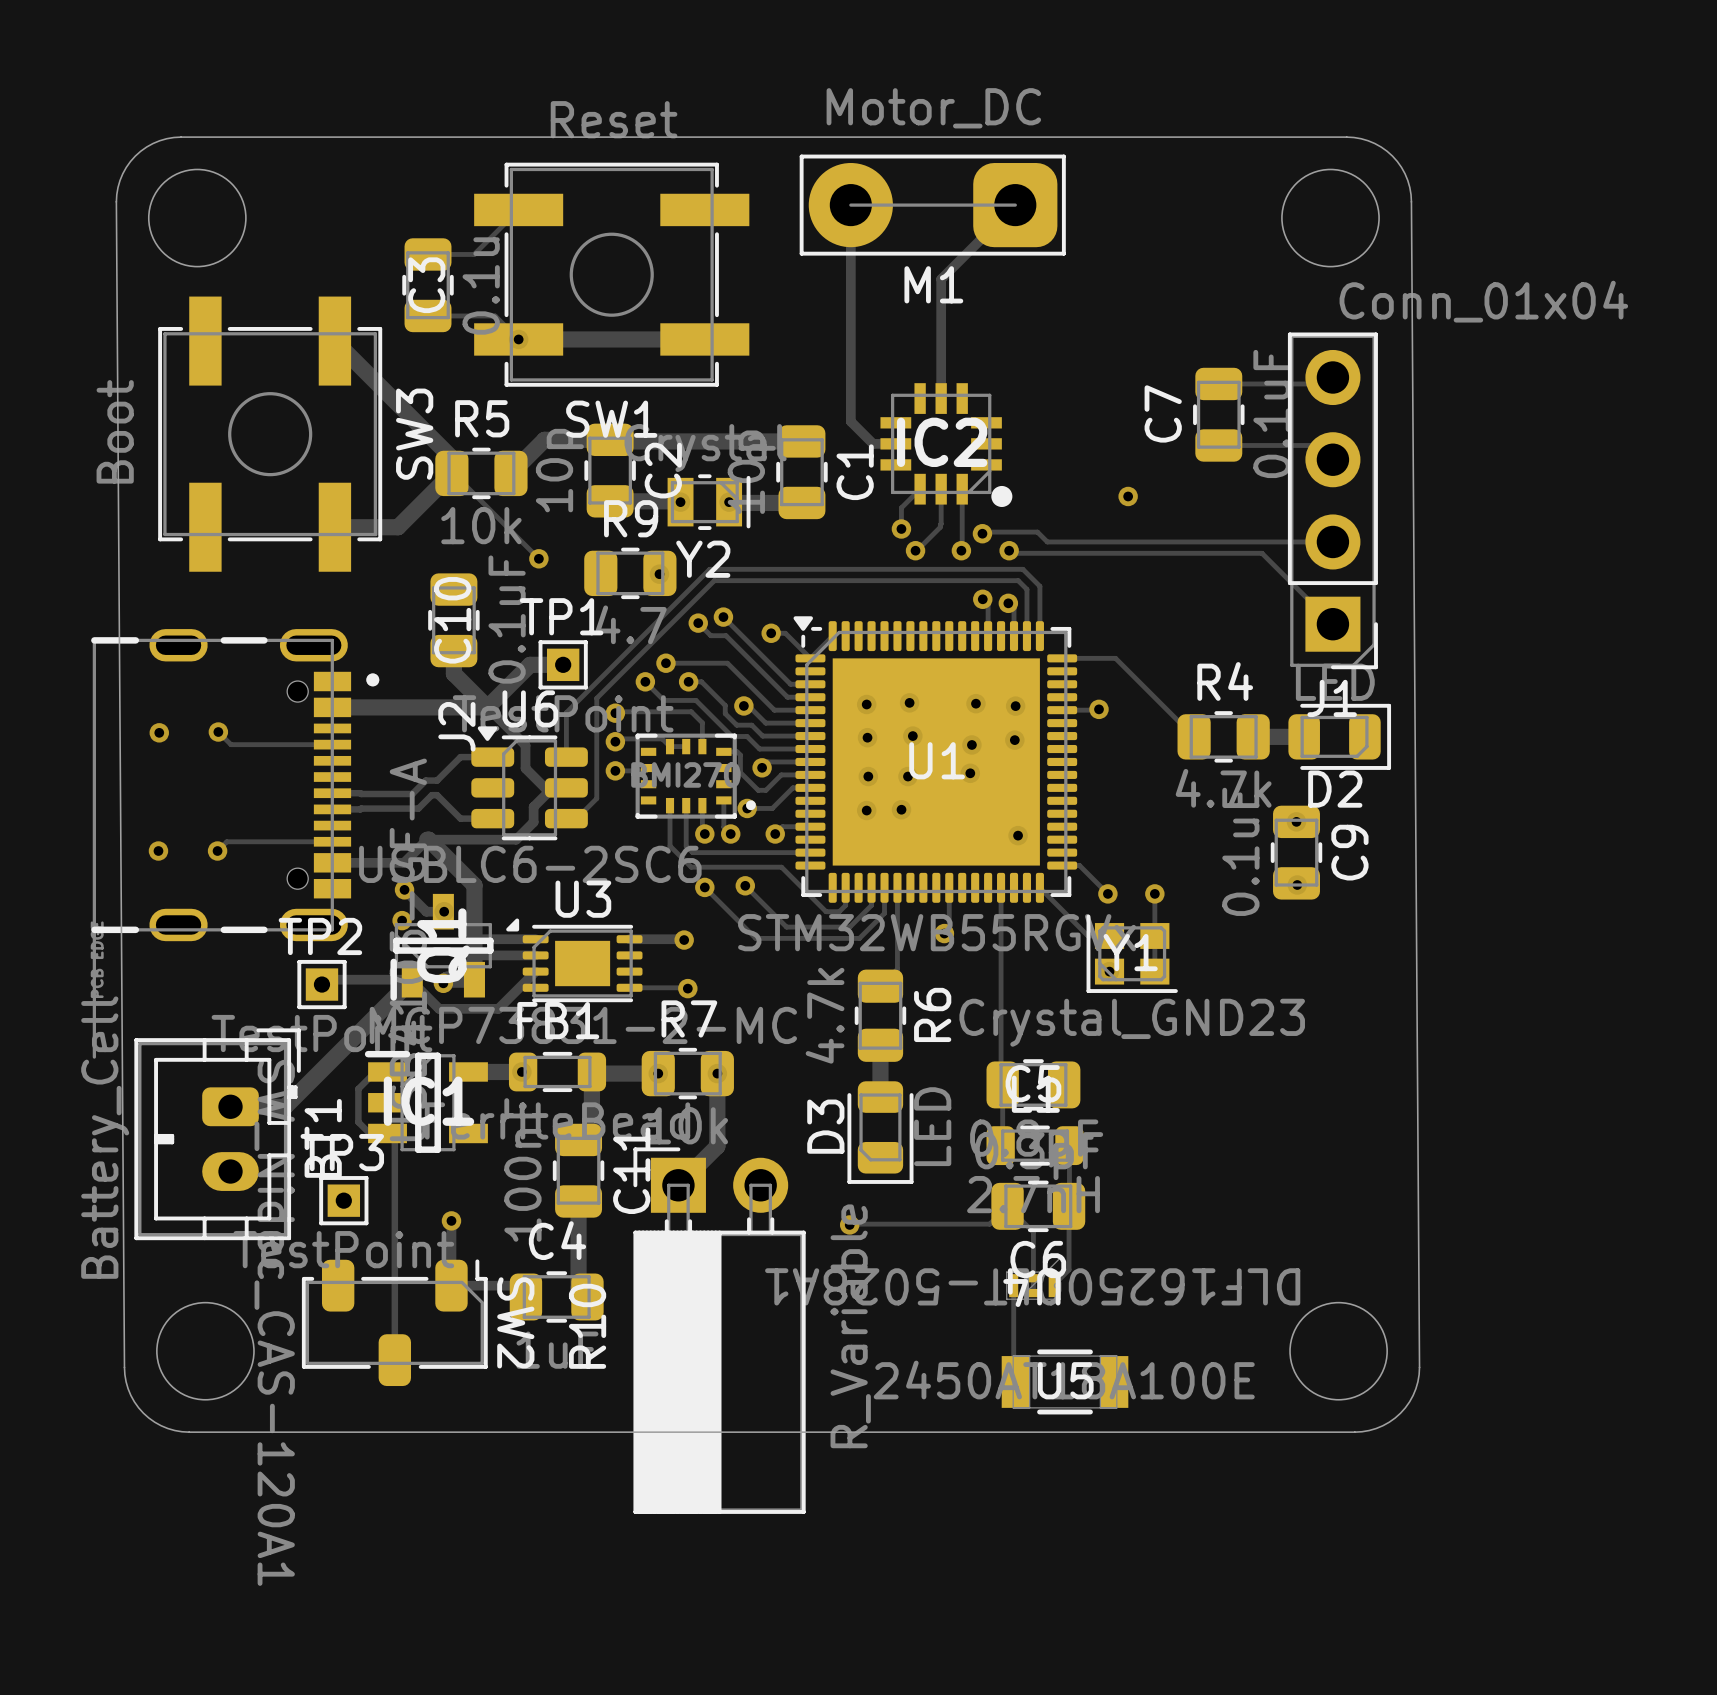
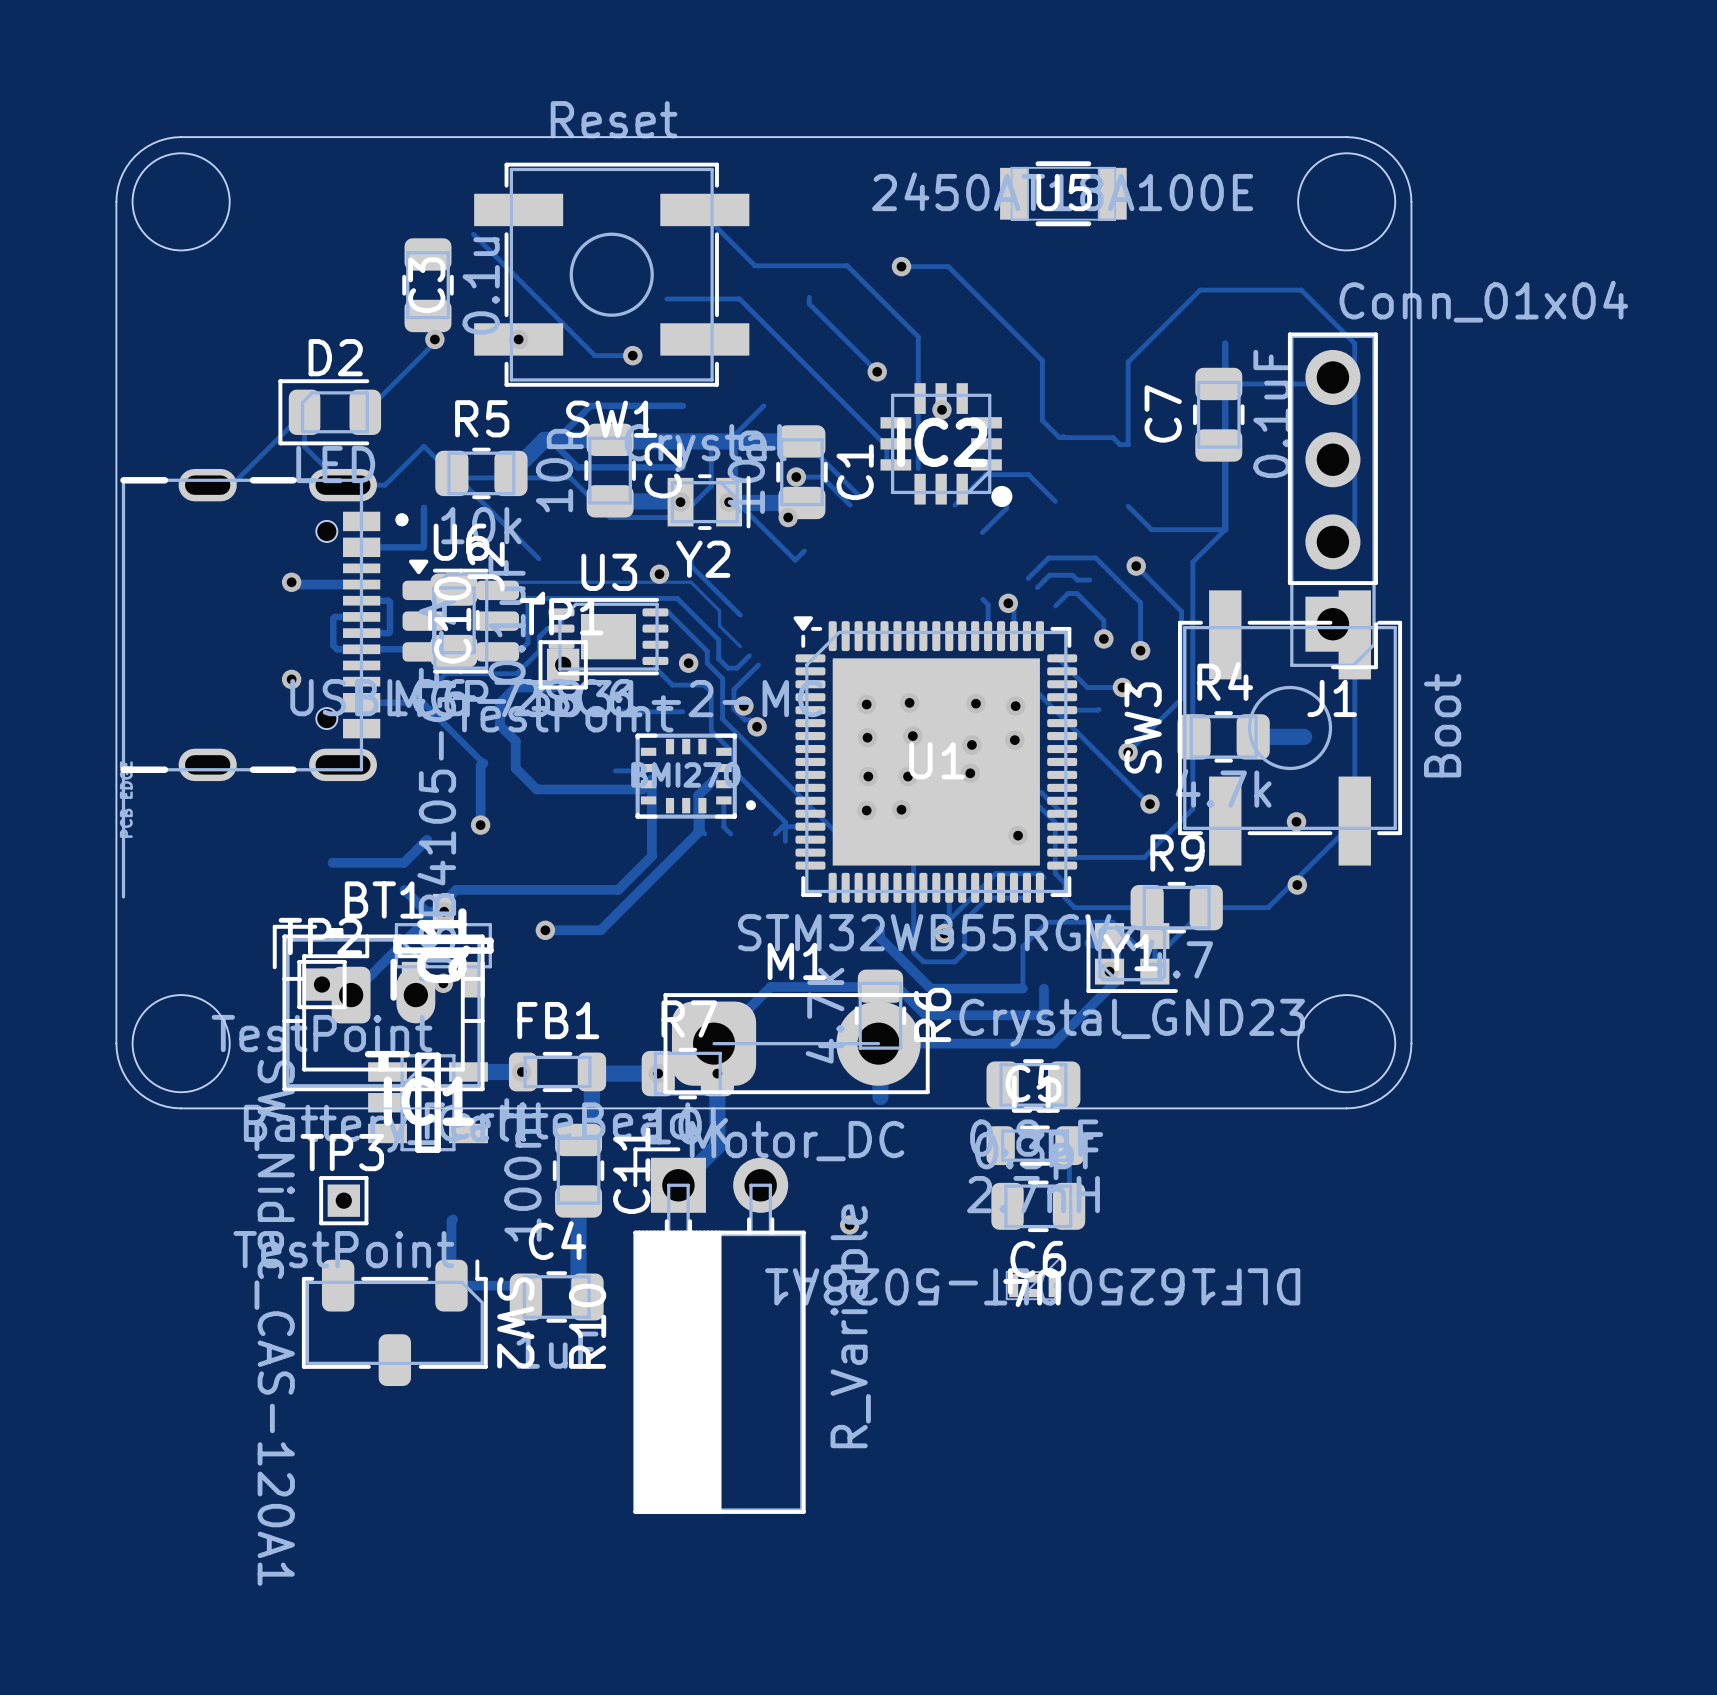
board edge: (116, 201) (124, 1374) (128, 1388) (134, 1401) (148, 1418) (167, 1428) (189, 1432) (1354, 1432) (1369, 1430) (1382, 1425) (1400, 1413) (1409, 1401) (1415, 1388) (1419, 1367) (1411, 201) -> (116, 201) (116, 1050) (122, 1071) (130, 1084) (140, 1094) (159, 1104) (181, 1108) (1346, 1108) (1368, 1104) (1387, 1094) (1397, 1084) (1405, 1071) (1409, 1058) (1411, 1043) (1411, 201)
track: (850, 205) (850, 421) (873, 443) (895, 443) -> none
M1 rotation: 0° (932, 205) -> 180° (796, 1043)
M1 position: (932, 205) -> (796, 1043)
track: (1015, 205) (941, 279) (941, 398) -> none
track: (518, 209) (474, 254) (428, 254) -> none
round board edge position: (197, 218) -> (181, 201)
round board edge position: (1330, 218) -> (1346, 201)
track: none -> (666, 219) (708, 219) (755, 265) (847, 265) (918, 336) (918, 468)
track: none -> (473, 234) (594, 355) (632, 355)
track: none -> (901, 266) (948, 266) (1042, 360) (1042, 420) (1059, 437) (1113, 437) (1120, 444) (1128, 444) (1128, 362) (1200, 290) (1301, 290) (1354, 343) (1354, 529)
via: none -> (901, 266)
track: none -> (809, 297) (809, 303) (877, 371)
track: none -> (666, 298) (739, 298) (886, 446) (886, 468)
track: (428, 315) (495, 315) (518, 339) (704, 339) -> none
track: none -> (434, 339) (434, 342) (365, 412)
via: none -> (434, 339)
track: (334, 341) (451, 458) (451, 473) (398, 527) (334, 527) -> none
track: none -> (1225, 343) (1225, 529)
via: none -> (632, 355)
via: none -> (877, 371)
track: none -> (682, 405) (590, 405) (553, 443) (577, 467) (682, 467)
track: none -> (763, 405) (735, 434) (735, 500) (795, 560) (804, 551)
via: none -> (941, 409)
SW3 value position: Boot (115, 431) -> Boot (1442, 725)
SW3 position: (270, 434) -> (1290, 727)
SW3 name position: SW3 (414, 434) -> SW3 (1143, 727)
track: none -> (682, 436) (707, 436) (711, 440) (711, 485) (679, 517) (610, 517) (570, 477) (455, 477) (423, 446) (385, 485) (343, 485) (304, 446) (304, 412) (231, 485) (207, 485)
track: (1218, 445) (1318, 445) (1332, 459) -> none
track: none -> (796, 451) (814, 451) (859, 496)
track: none -> (796, 477) (822, 477) (850, 505)
via: none -> (796, 477)
track: (920, 489) (901, 507) (901, 528) -> none
track: (941, 489) (940, 527) (915, 550) -> none
track: (962, 489) (961, 550) -> none
via: (1128, 496) -> none
track: none -> (1055, 501) (1028, 474) (985, 474) (954, 505)
track: none -> (1128, 506) (1151, 529) (1225, 529)
track: none -> (423, 507) (423, 547) (361, 547)
via: none -> (788, 517)
via: (901, 528) -> none
track: none -> (1225, 529) (1192, 562) (1192, 808) (1144, 857) (1066, 857) (1066, 817) (1041, 792) (1029, 792) (999, 763) (999, 746) (982, 729)
track: (982, 533) (984, 532) (1037, 532) (1047, 541) (1332, 541) -> (982, 532) (1006, 508) (1006, 493)
via: (982, 533) -> none
via: (915, 550) -> none
via: (961, 550) -> none
track: (1009, 550) (1011, 553) (1262, 553) (1332, 624) -> none
via: (1009, 550) -> none
track: none -> (691, 557) (691, 565) (740, 615)
via: (538, 558) -> none
track: none -> (1136, 566) (1181, 611) (1181, 698) (1128, 752)
via: none -> (1136, 566)
R9 position: (630, 573) -> (1176, 907)
track: none -> (1028, 578) (1048, 557) (1095, 557) (1140, 602) (1140, 650)
track: none -> (1089, 580) (1077, 580) (1072, 575) (1049, 575) (1037, 587)
track: none -> (291, 582) (293, 584) (361, 584)
via: none -> (291, 582)
track: none -> (497, 590) (505, 582) (691, 582) (719, 610) (719, 625) (740, 646)
via: (982, 599) -> none
track: none -> (361, 600) (388, 600) (389, 602) (389, 631) (388, 633) (361, 633)
track: none -> (1055, 605) (1068, 593) (1077, 593) (1103, 620) (1103, 638)
track: none -> (561, 612) (561, 628) (547, 628) (539, 636) (539, 651) (516, 673) (445, 673) (440, 679)
track: none -> (655, 612) (668, 612) (707, 651) (707, 663) (722, 678) (722, 719) (836, 833) (844, 833)
track: none -> (361, 616) (334, 616) (333, 618) (333, 645) (337, 649) (421, 649) (423, 651)
track: (723, 617) (790, 684) (810, 684) -> none
via: (723, 617) -> none
track: (698, 623) (710, 635) (726, 635) (787, 697) (810, 697) -> none
via: (698, 623) -> none
track: (771, 633) (785, 633) (810, 658) (832, 636) -> none
via: (771, 633) -> none
track: none -> (1354, 634) (1354, 821) (1268, 907) (1206, 907) (1167, 946) (1137, 946) (1112, 922) (1047, 922) (1022, 946) (1022, 988) (930, 988) (880, 938) (880, 930)
track: (1026, 636) (1026, 589) (1018, 580) (714, 580) (596, 698) (596, 798) (576, 818) (566, 818) -> none
track: (1039, 636) (1039, 586) (1022, 569) (709, 569) (566, 712) (566, 757) -> none
via: none -> (1103, 638)
track: none -> (561, 644) (561, 679) (553, 687) (515, 687) (500, 703) (500, 725) (515, 741) (515, 768) (536, 789) (642, 789) (651, 779) (651, 856) (618, 889) (456, 889) (351, 995)
via: none -> (1140, 650)
track: (453, 651) (453, 673) (487, 707) -> none
track: none -> (497, 651) (519, 651) (527, 642) (527, 598) (677, 598) (718, 639) (718, 658) (728, 668) (737, 668) (749, 655)
track: none -> (1055, 655) (1087, 687) (1122, 687)
track: (1062, 658) (1115, 658) (1194, 736) -> none
track: none -> (655, 660) (655, 668) (672, 685) (704, 685) (711, 692) (711, 730) (733, 753) (733, 770) (785, 822) (785, 841)
track: (665, 663) (727, 663) (774, 710) (810, 710) -> none
via: (665, 663) -> none
track: (563, 664) (530, 664) (487, 707) -> none
track: none -> (758, 664) (733, 689) (733, 709) (744, 719) (750, 719) (757, 726)
track: none -> (1037, 674) (1028, 683) (1150, 804)
via: none -> (291, 679)
track: (645, 681) (663, 700) (696, 700) (732, 736) (747, 736) (759, 749) (810, 749) -> none
via: (645, 681) -> none
track: (688, 681) (701, 681) (725, 705) (725, 713) (736, 725) (751, 725) (762, 736) (810, 736) -> none
via position: (688, 681) -> (688, 663)
via: none -> (1122, 687)
track: none -> (361, 702) (422, 702) (483, 763) (480, 766) (480, 825)
track: (743, 705) (748, 705) (765, 723) (810, 723) -> none
track: (332, 707) (487, 707) -> none
track: (487, 707) (525, 745) (525, 768) (544, 787) (566, 787) -> none
via: (1099, 709) -> none
track: (682, 711) (691, 711) (702, 722) (702, 746) -> none
via: (615, 713) -> none
via: none -> (757, 726)
via: (159, 732) -> none
track: (218, 732) (230, 744) (332, 744) -> none
via: (218, 732) -> none
D2 rotation: 0° (1339, 736) -> 180° (329, 412)
D2 position: (1339, 736) -> (329, 412)
track: none -> (973, 738) (988, 753) (988, 767) (1024, 804) (1036, 804) (1055, 822) (1055, 873) (1065, 883) (1065, 897) (1074, 907) (1147, 907)
track: (615, 741) (618, 738) (662, 738) (670, 746) (686, 746) -> none
via: (615, 741) -> none
track: (723, 751) (737, 751) (740, 755) (740, 772) (758, 790) (765, 790) (781, 774) (810, 774) -> none
via: none -> (1128, 752)
track: (492, 757) (460, 757) (437, 780) (425, 780) (412, 794) (332, 793) -> none
track: (810, 761) (767, 761) (762, 767) -> none
via: (762, 767) -> none
via: (615, 770) -> none
track: none -> (714, 779) (698, 795) (698, 832) (600, 930) (545, 930)
U6 position: (529, 783) -> (460, 616)
track: (552, 787) (533, 806) (533, 822) (516, 839) (427, 839) (474, 885) (474, 979) (447, 979) (443, 983) -> none
track: (810, 787) (792, 787) (772, 808) (747, 808) -> none
via: none -> (1150, 804)
track: (670, 805) (670, 845) (691, 867) (781, 867) (826, 911) (839, 911) (845, 905) (845, 887) -> none
track: (686, 805) (686, 846) (692, 852) (810, 852) -> none
via: (747, 808) -> none
track: (332, 809) (418, 808) (431, 795) (437, 795) (460, 818) (492, 818) -> none
via: none -> (480, 825)
track: none -> (933, 825) (913, 845) (913, 952) (923, 961) (954, 961) (964, 952) (964, 920) (987, 897) (1022, 897)
via: (704, 834) -> none
via: (730, 834) -> none
via: (775, 834) -> none
track: (332, 841) (226, 841) (217, 851) -> none
J2 position: (235, 843) -> (264, 683)
via: (158, 851) -> none
via: (217, 851) -> none
C9: 0.1uF (1296, 852) -> none
track: (1062, 865) (1079, 865) (1107, 893) -> none
track: none -> (1043, 877) (1039, 873) (995, 873) (939, 930)
track: (745, 885) (786, 927) (849, 927) (871, 905) (871, 887) -> none
via: (745, 885) -> none
track: (704, 887) (755, 938) (859, 938) (884, 913) (884, 887) -> none
via: (704, 887) -> none
track: (897, 887) (897, 969) (880, 986) -> none
track: (1001, 887) (1002, 1143) (1000, 1145) -> none
track: (1039, 887) (1088, 935) (1109, 935) -> none
via: (404, 889) -> none
via: (1107, 893) -> none
via: (1154, 893) -> none
via: (402, 920) -> none
via: none -> (545, 930)
track: (535, 939) (474, 940) -> none
track: (629, 939) (684, 940) -> none
via: (684, 940) -> none
track: none -> (1089, 943) (1114, 943) (1116, 944) (1116, 981) (1053, 1043) (878, 1043)
track: (474, 954) (535, 955) -> none
U3 position: (574, 960) -> (600, 633)
track: (535, 971) (498, 1008) (439, 1008) (412, 982) (412, 979) -> none
track: (412, 979) (285, 1106) (230, 1106) -> none
track: (412, 979) (326, 979) (321, 984) -> none
track: (629, 987) (687, 988) -> none
via: (687, 988) -> none
track: none -> (1043, 988) (1043, 1013) (1042, 1015) (925, 1015) (897, 986) (770, 986) (714, 1043)
track: (387, 1071) (375, 1071) (358, 1088) (358, 1122) (369, 1133) (387, 1133) (394, 1140) (394, 1360) -> none
D3: LED (880, 1132) -> none
BT1 rotation: 0° (217, 1134) -> 90° counterclockwise (378, 1008)
BT1 position: (217, 1134) -> (378, 1008)
track: (1069, 1206) (1069, 1269) (1053, 1285) -> none
via: (451, 1220) -> none
track: (849, 1224) (989, 1224) (1007, 1206) (1033, 1232) (1033, 1293) -> none
track: (1013, 1285) (1013, 1380) (1015, 1381) -> none
round board edge position: (205, 1351) -> (181, 1043)
round board edge position: (1338, 1351) -> (1346, 1043)
U5 position: (1065, 1381) -> (1063, 193)

